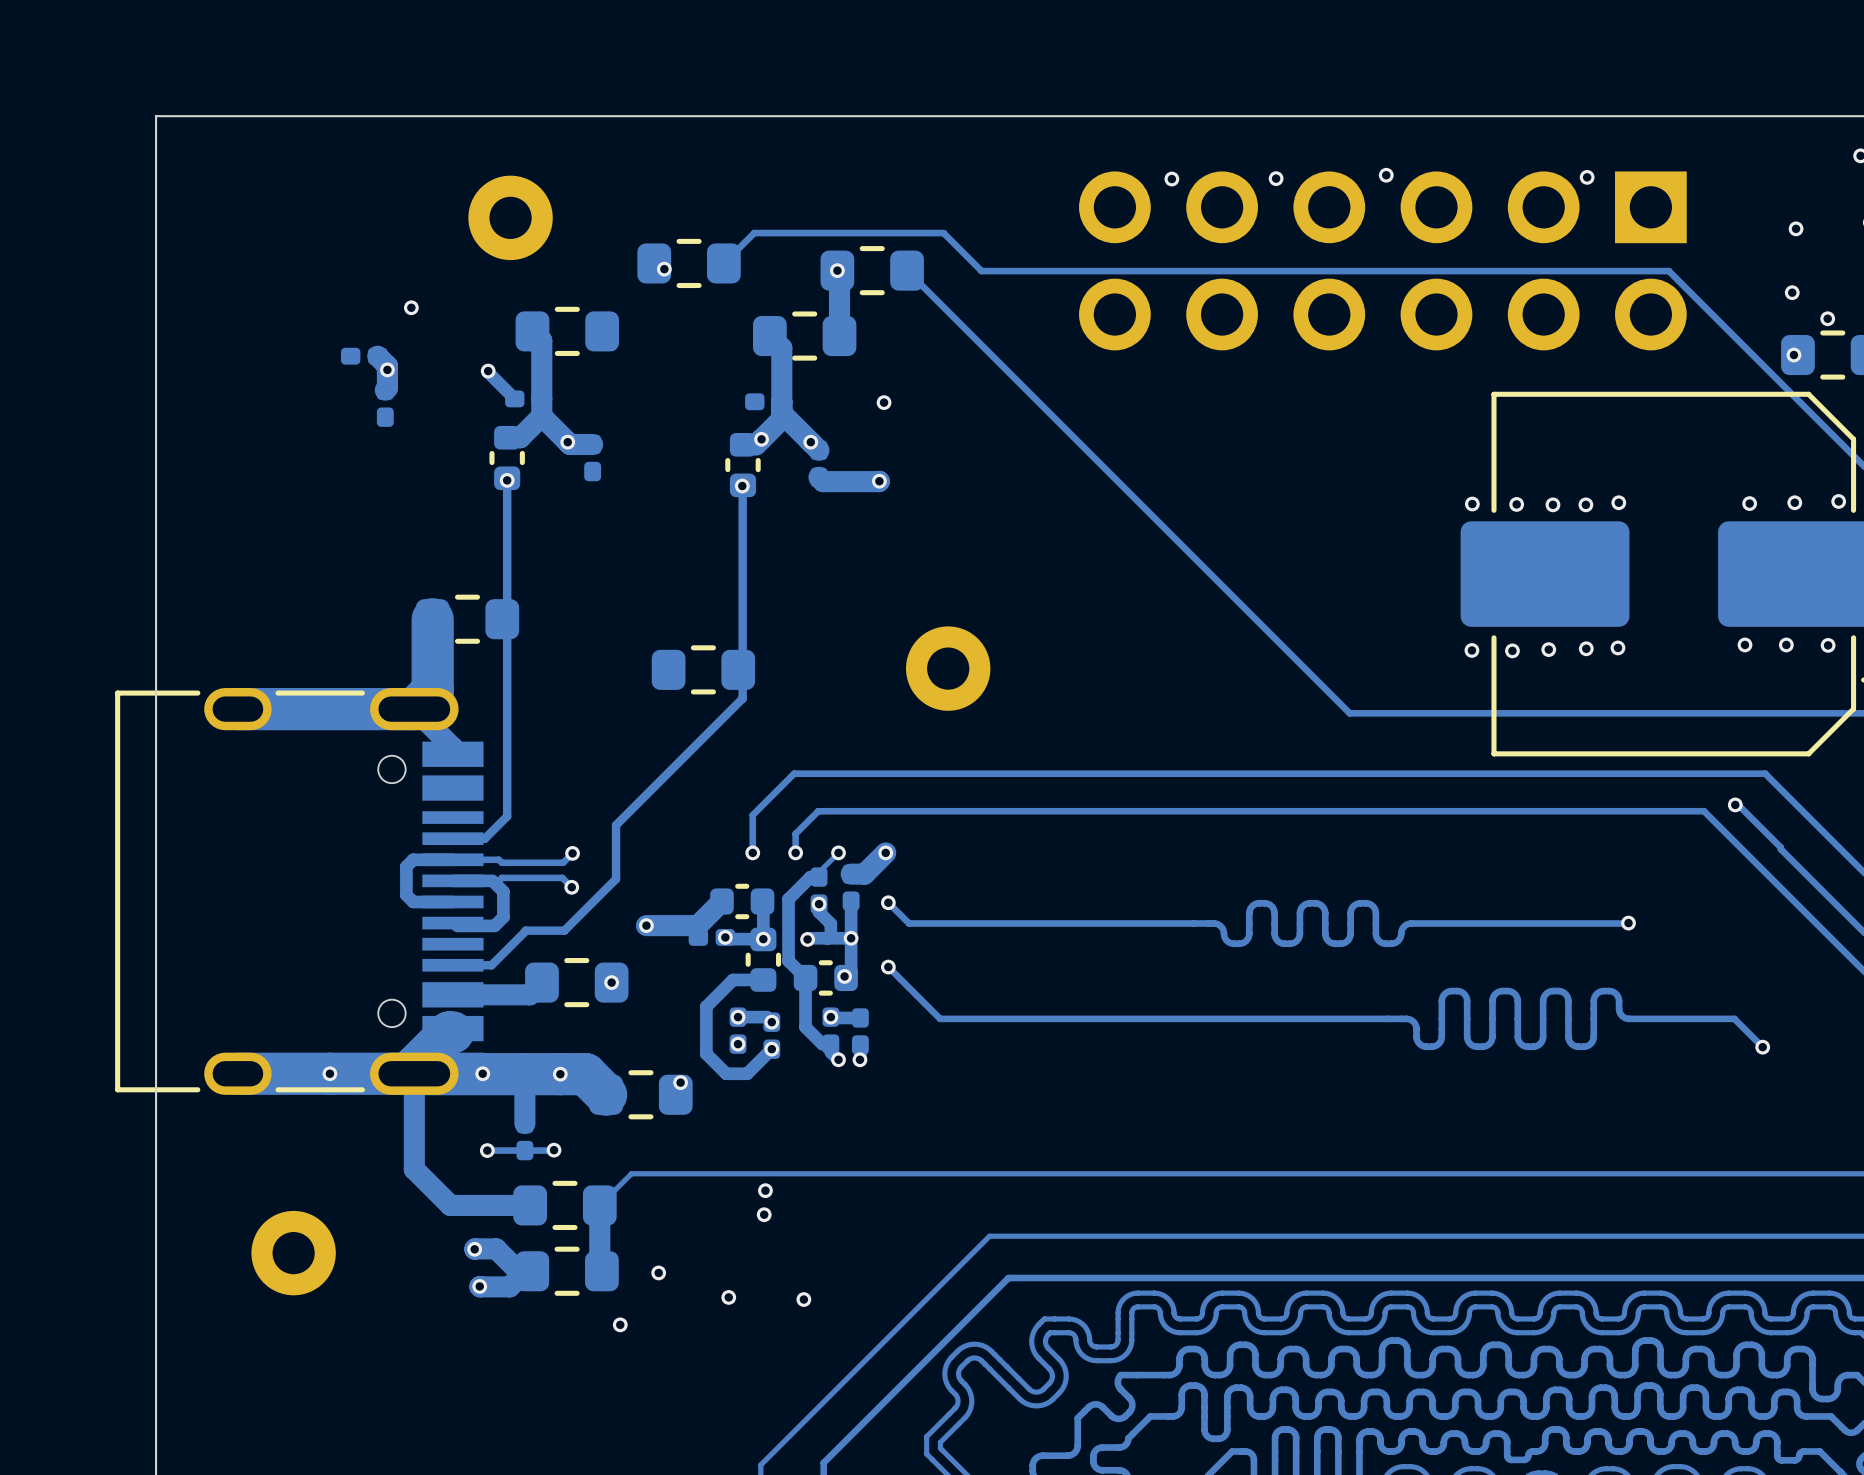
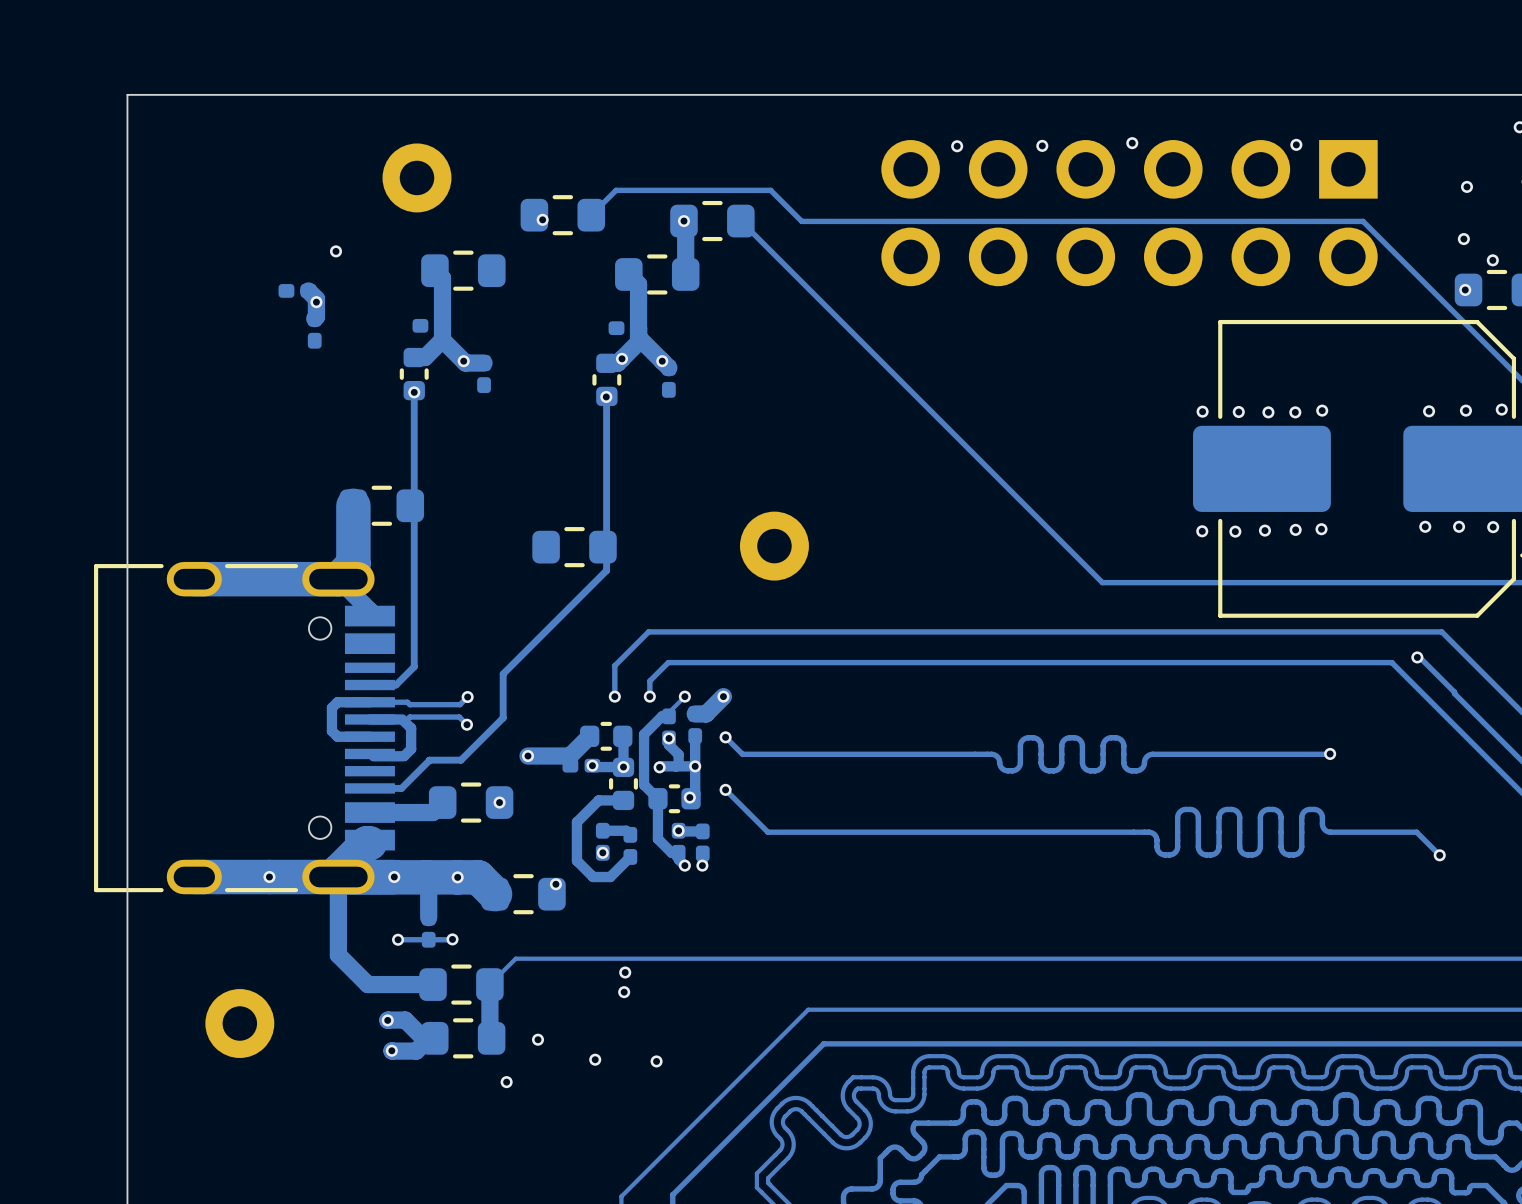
track: (488, 371) (514, 398) -> none
via: (488, 371) -> none
via: (884, 402) -> none
track: (818, 477) (823, 481) (878, 481) -> none
via: (879, 481) -> none
via: (738, 1017) -> none
via: (771, 1022) -> none
via: (771, 1049) -> none

